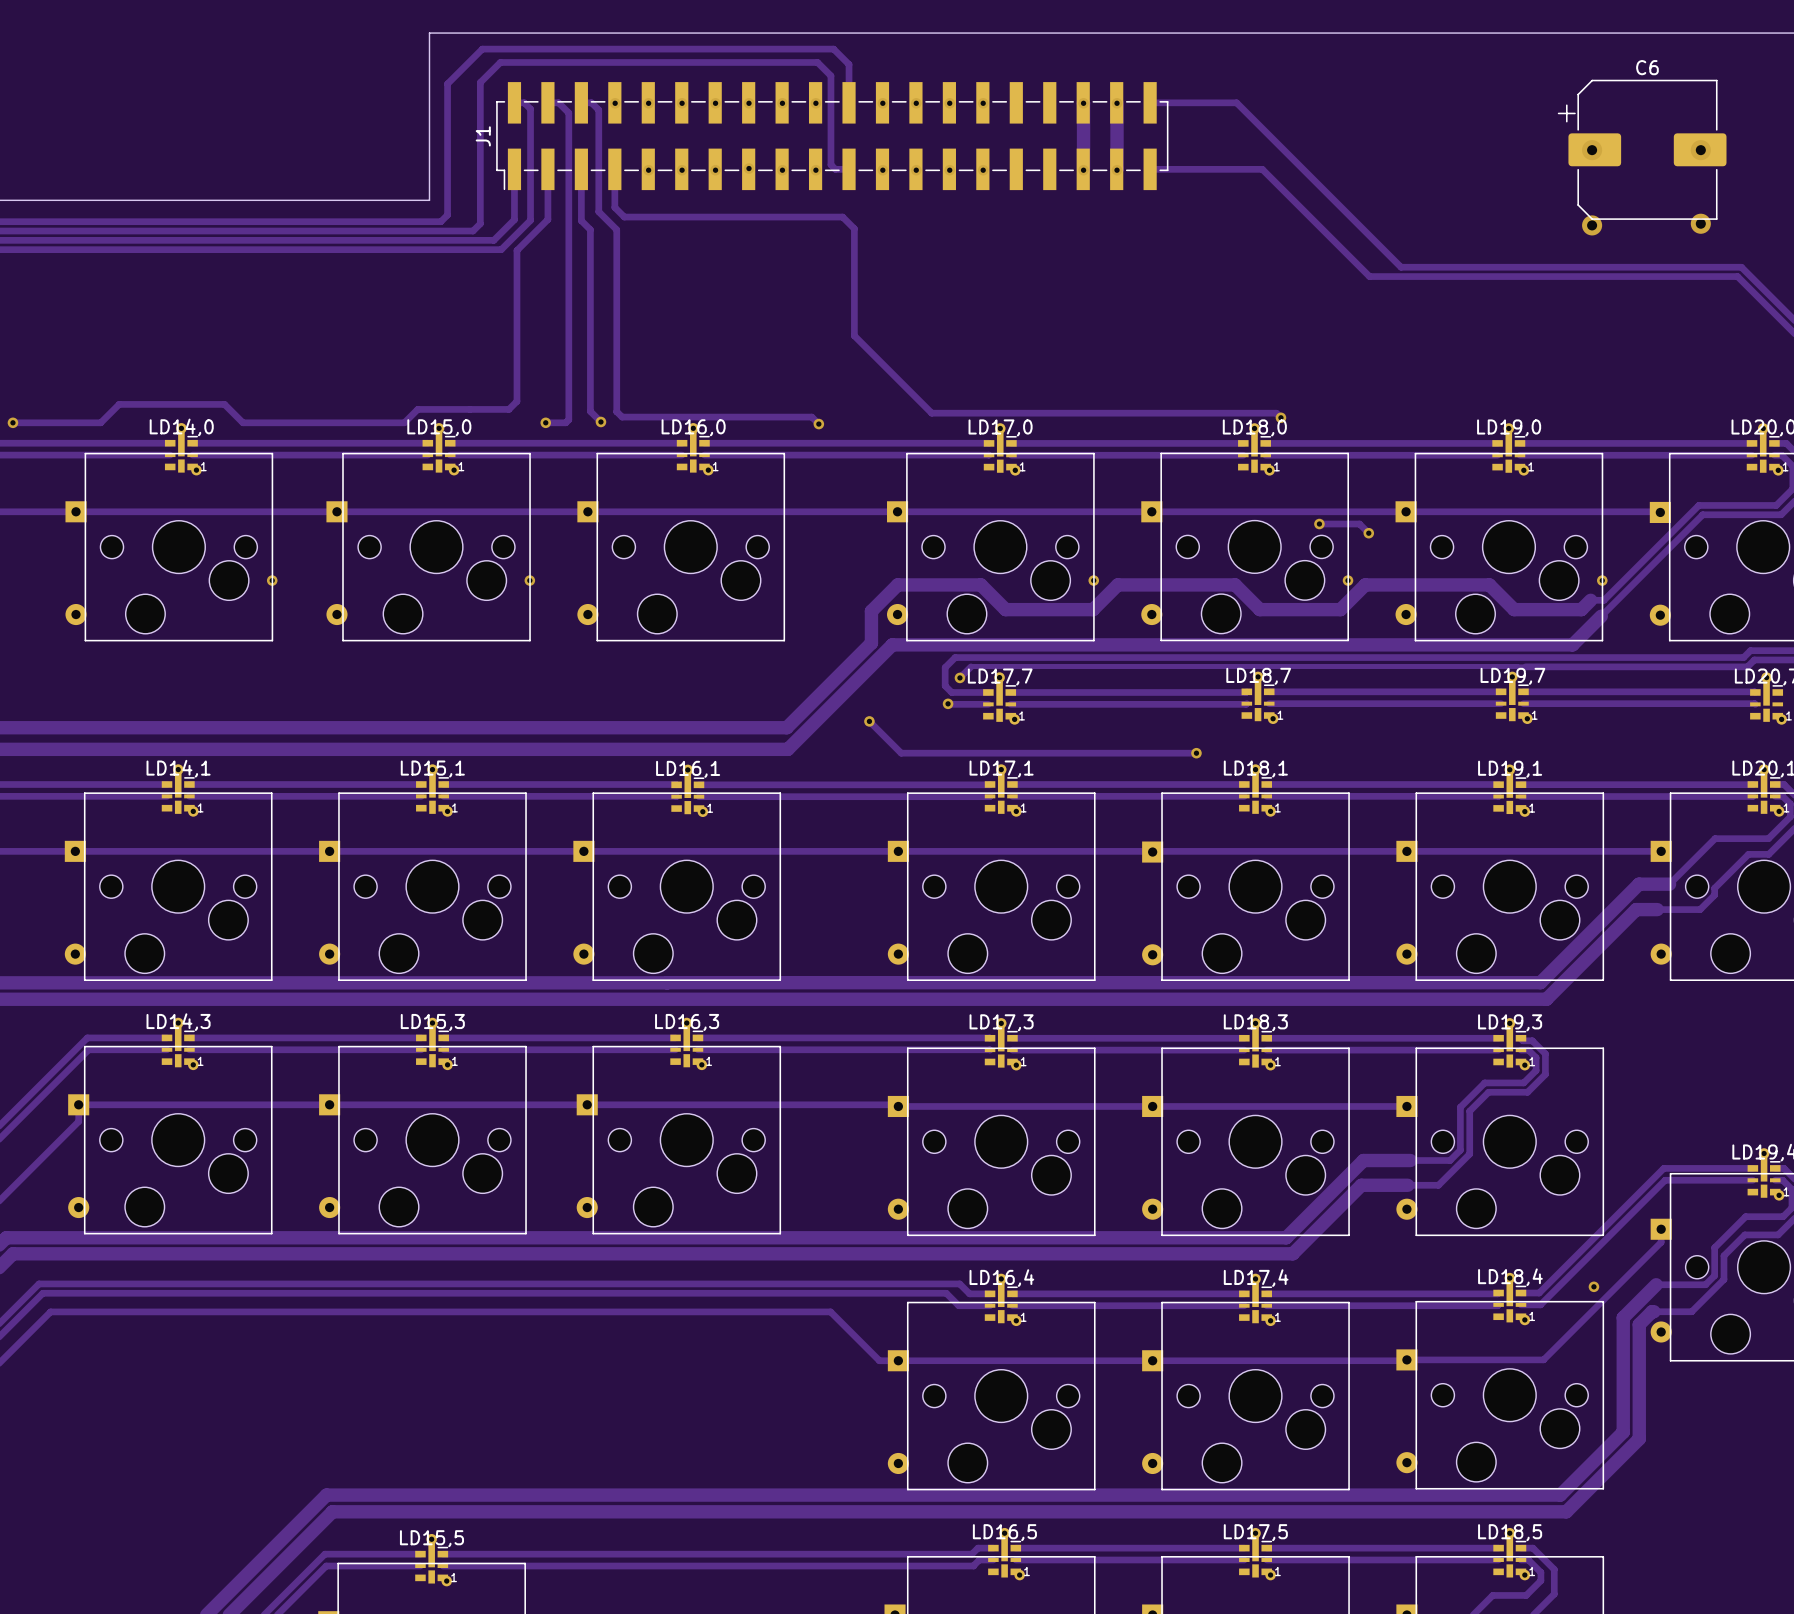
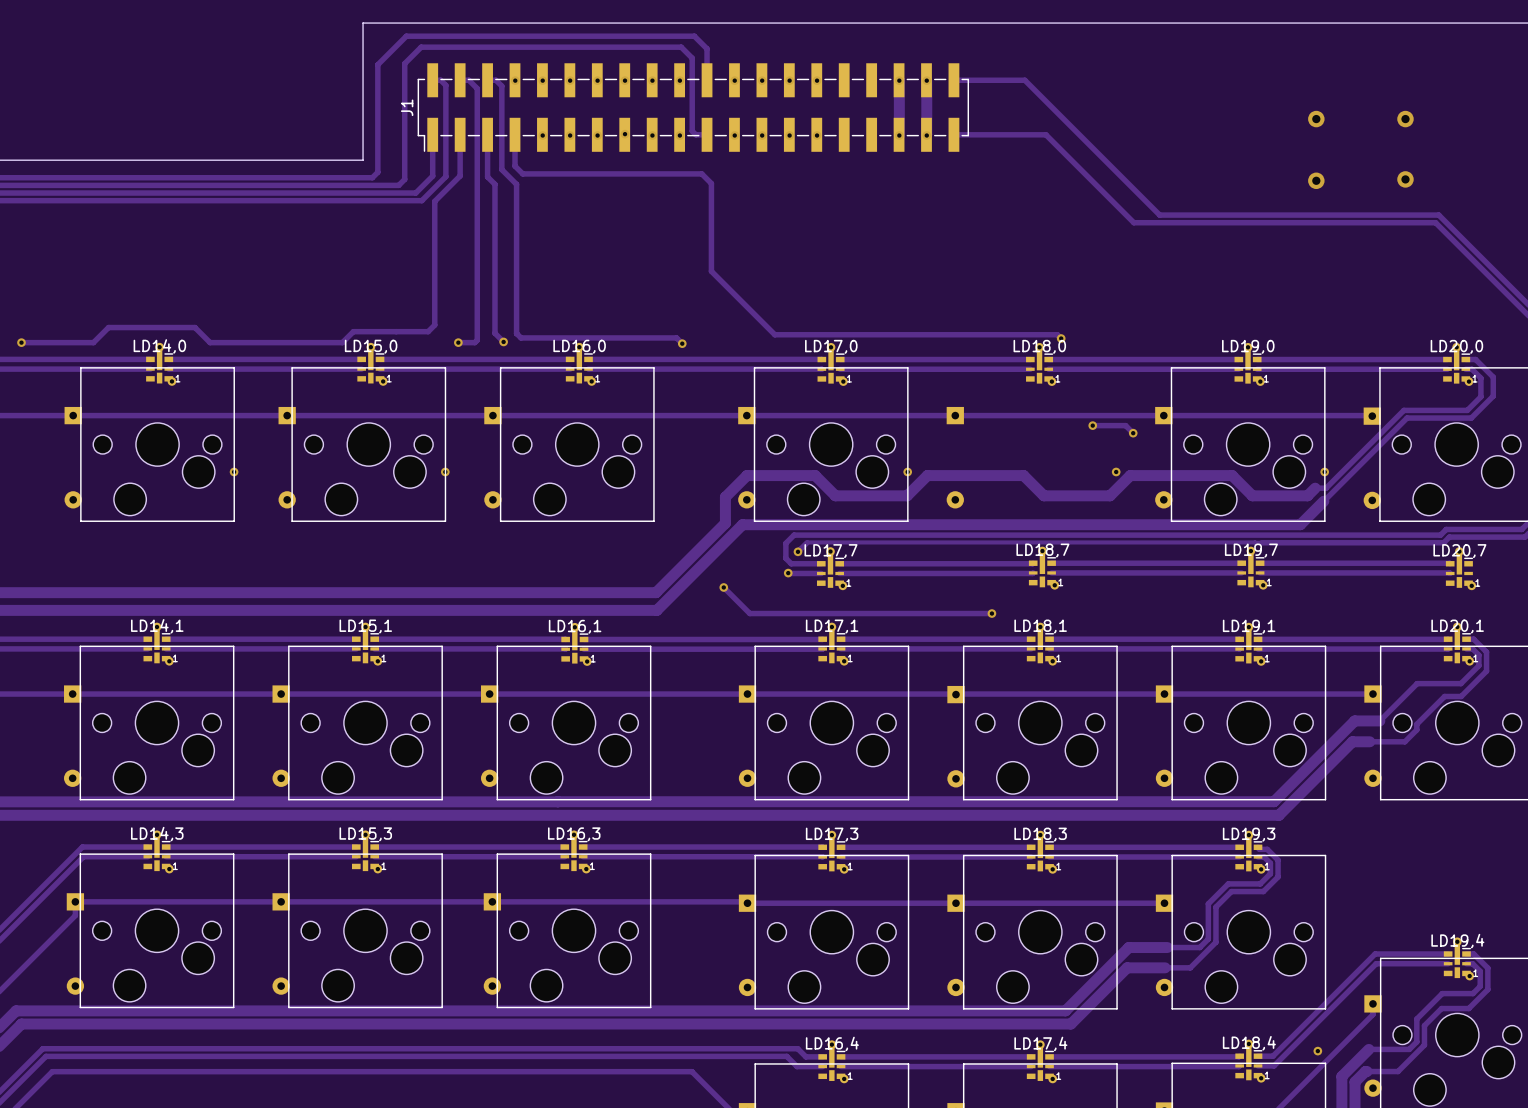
C6: (1642, 149) -> none
part: (1254, 546) -> none

